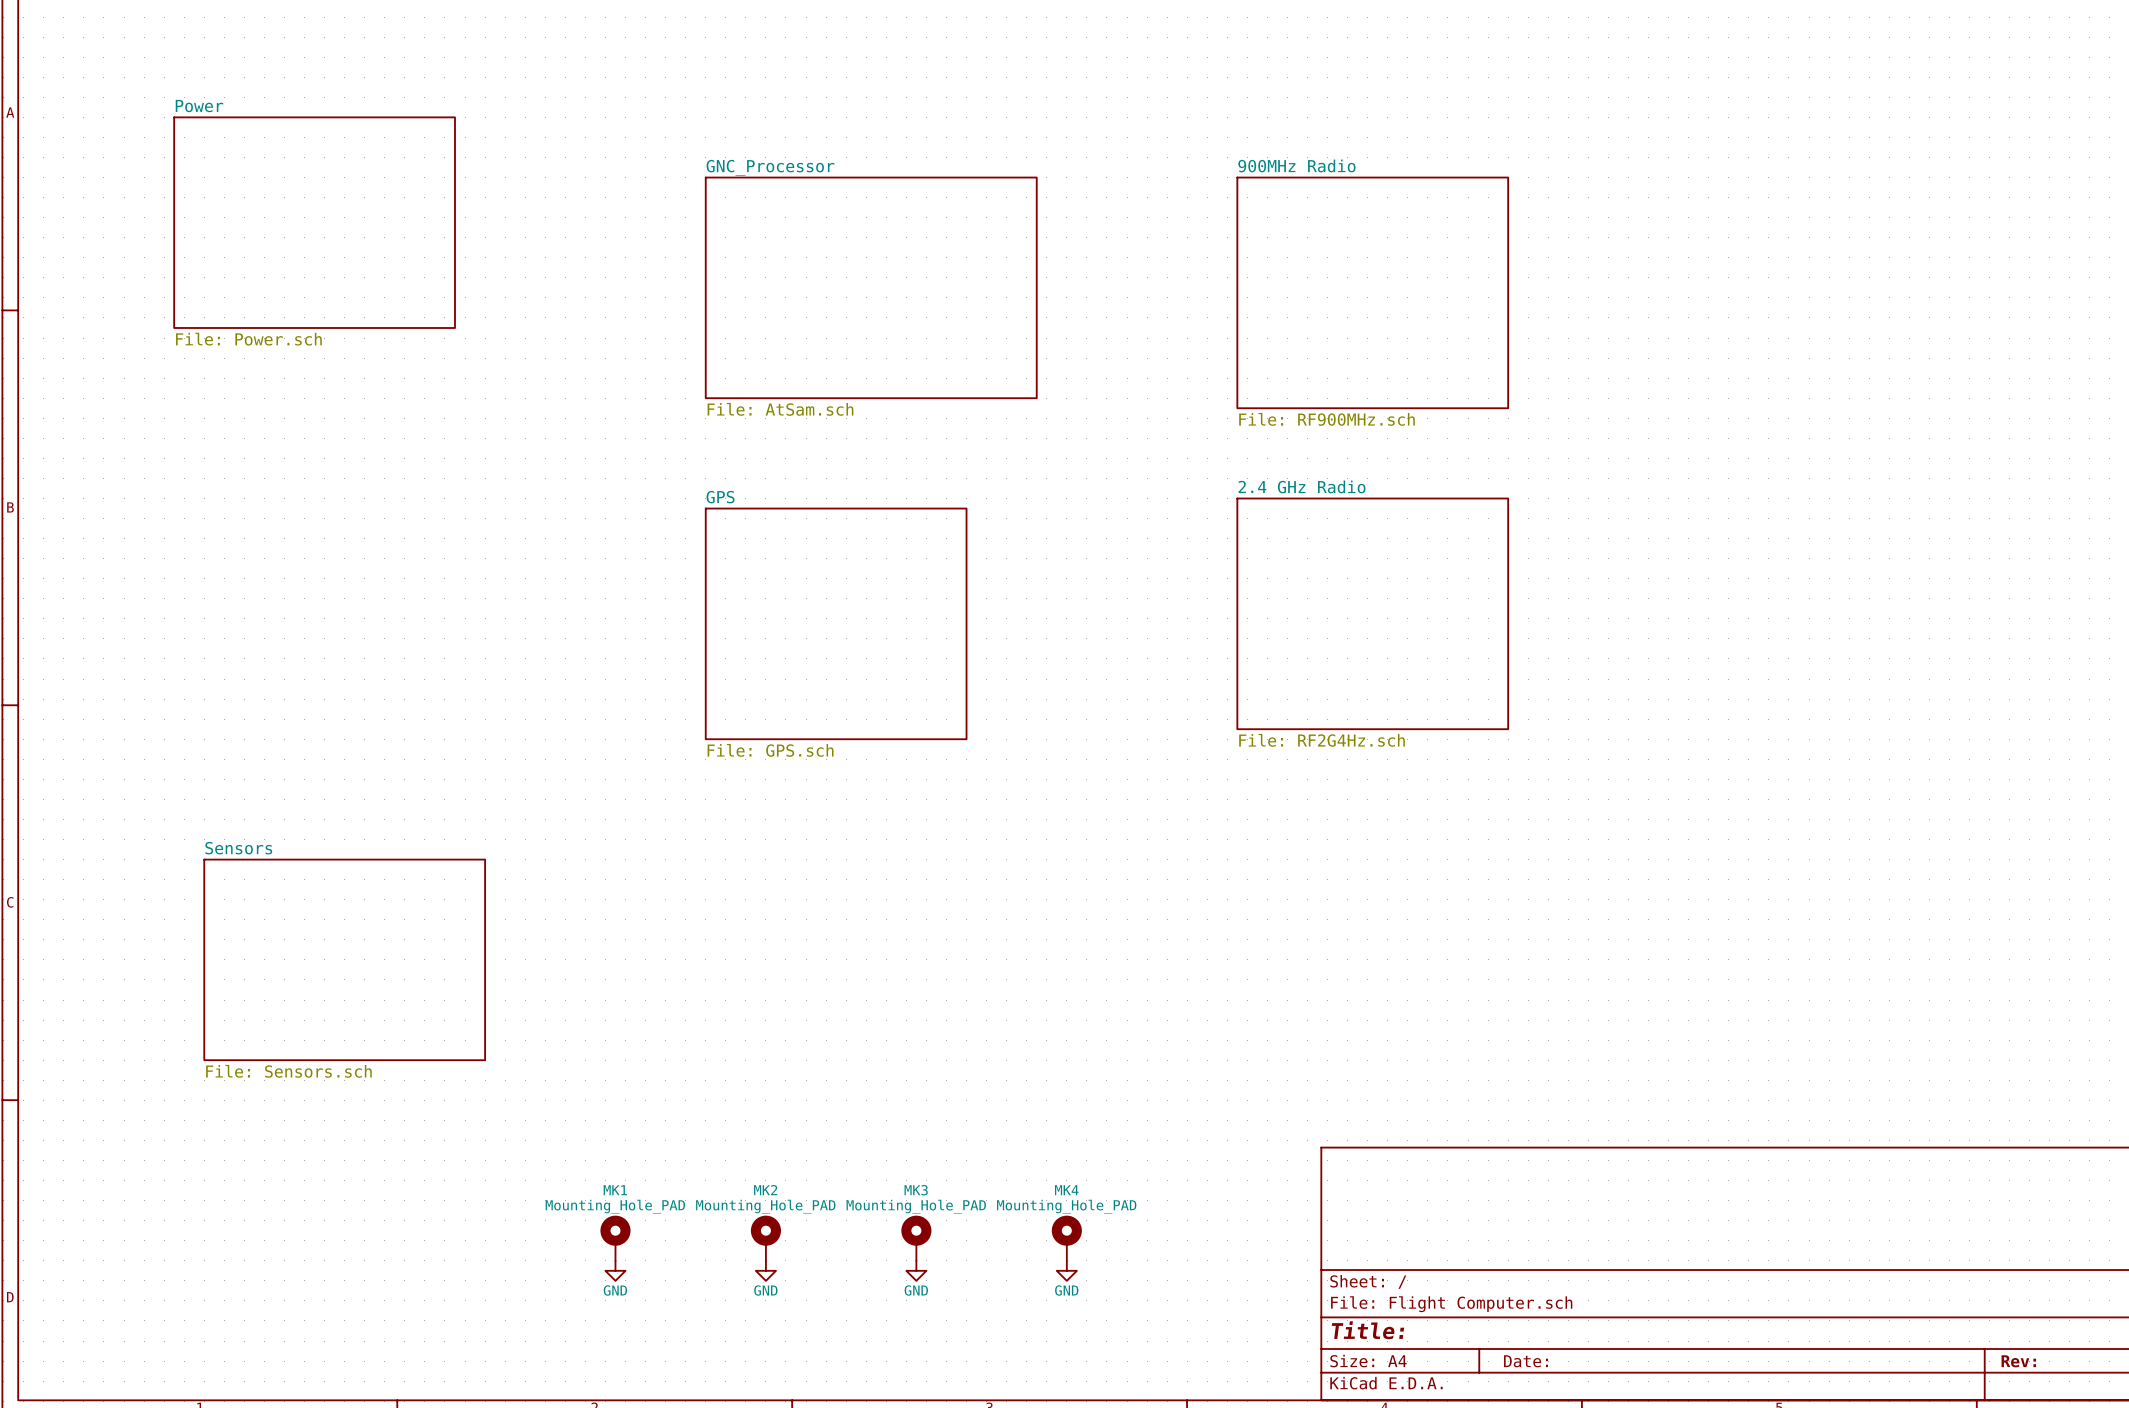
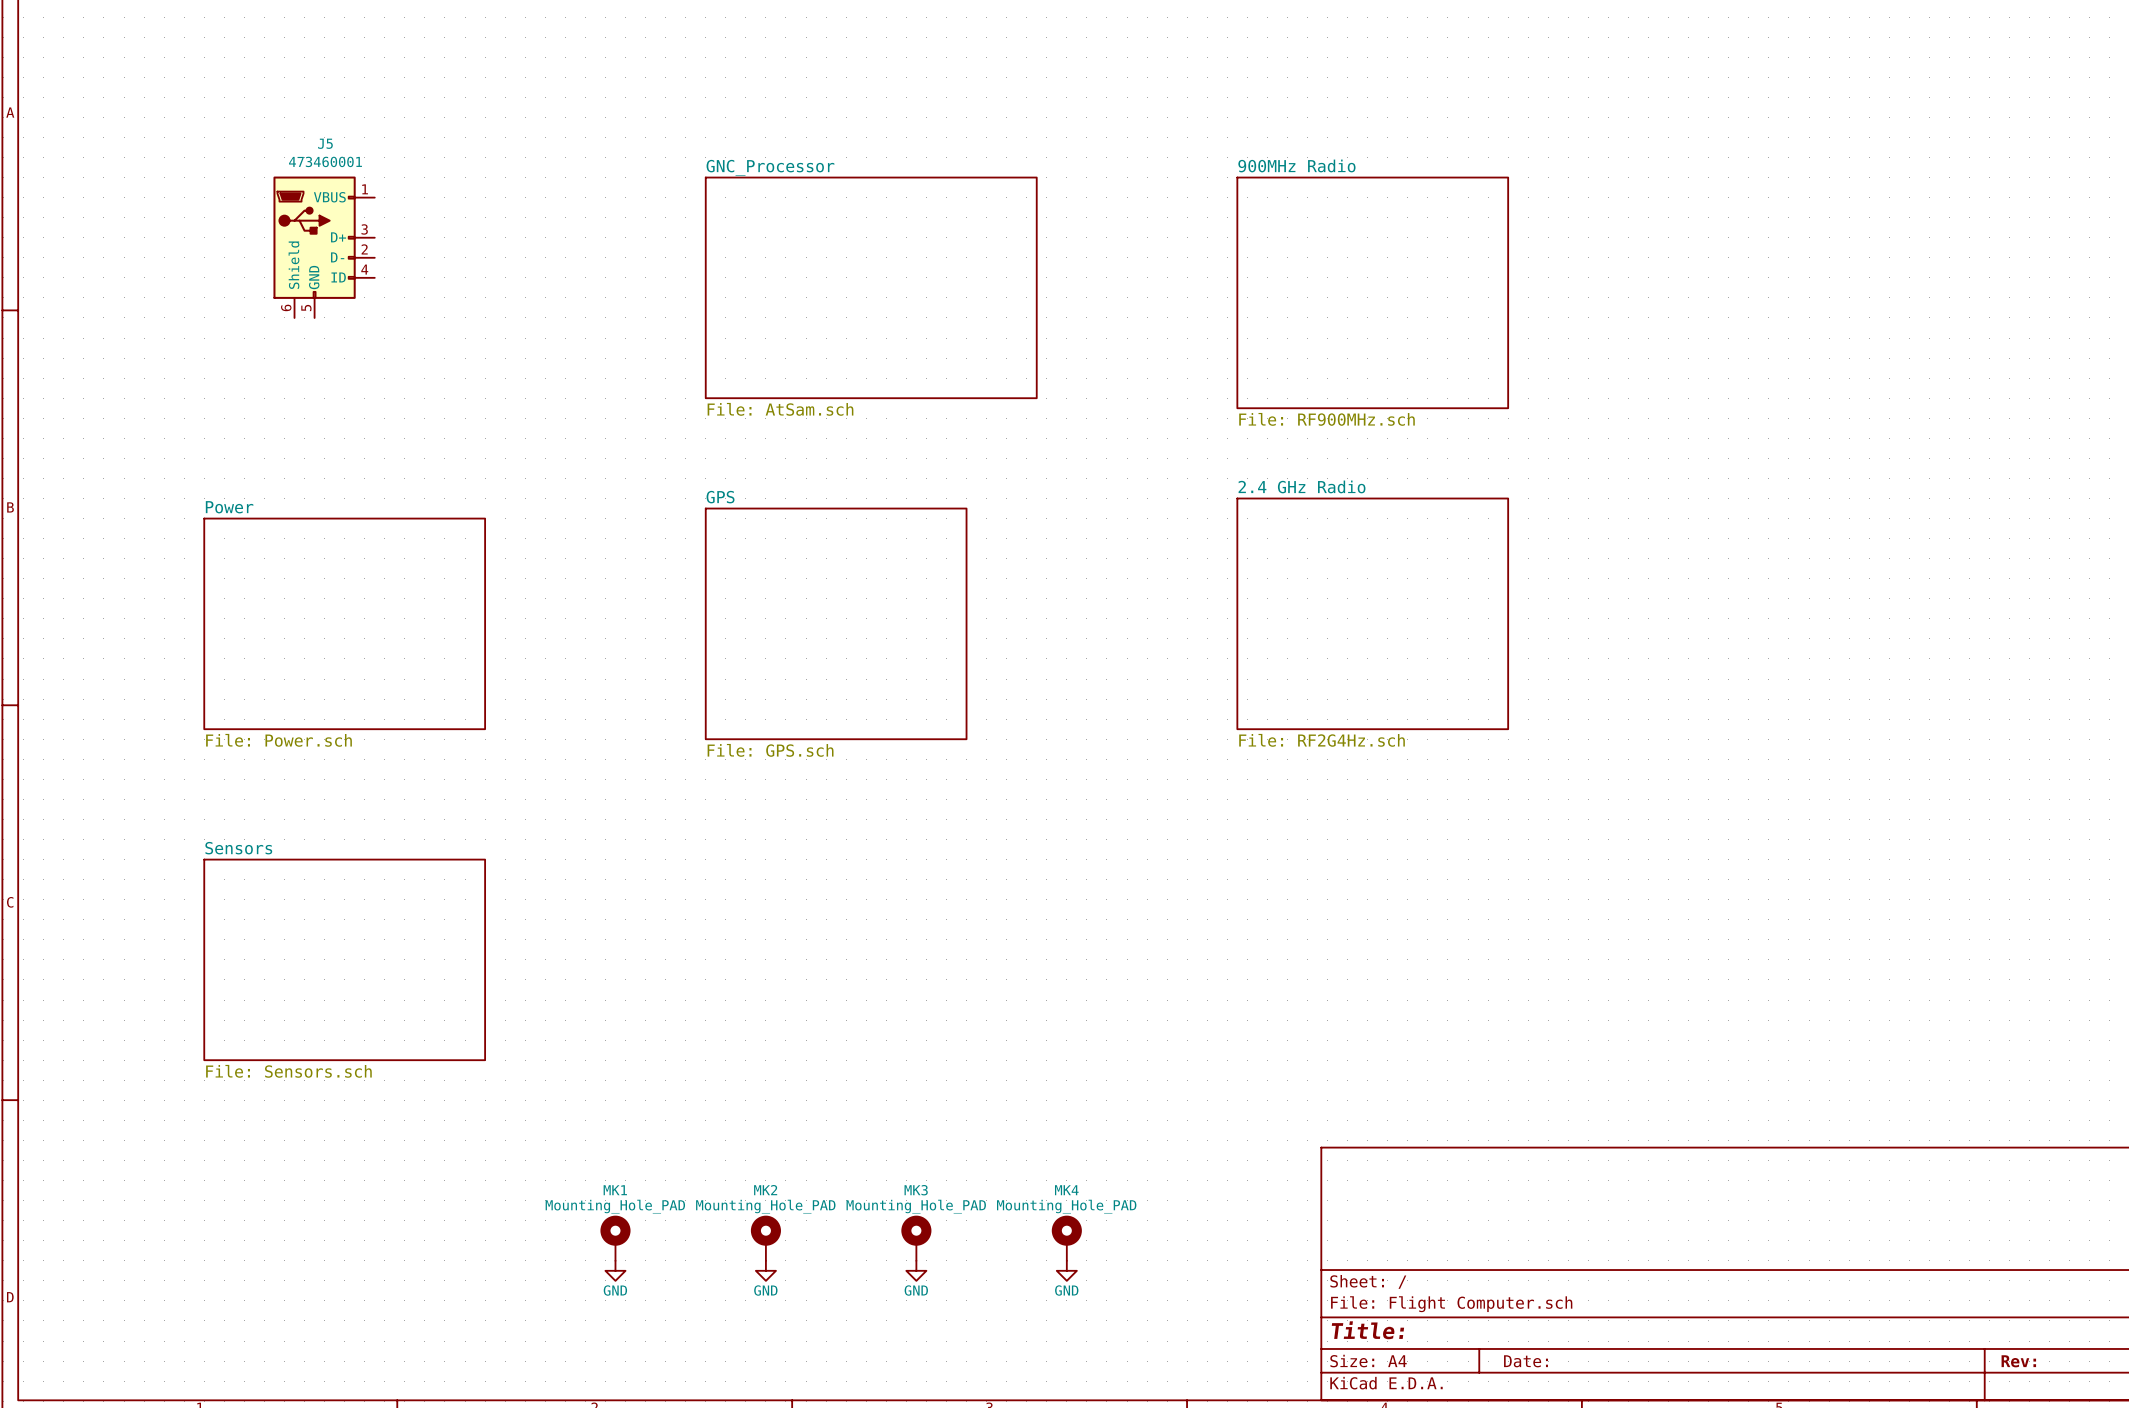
sheet Power: File: Power.sch (314, 222) -> none
J5: none -> 473460001 (324, 247)
sheet Power: none -> File: Power.sch (344, 623)

